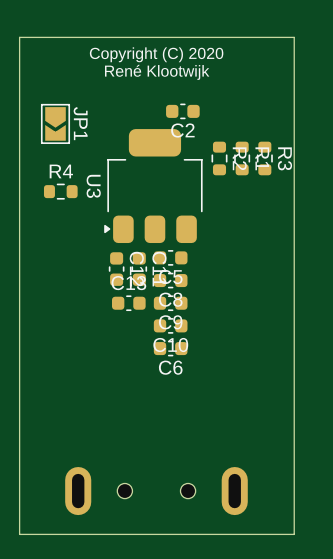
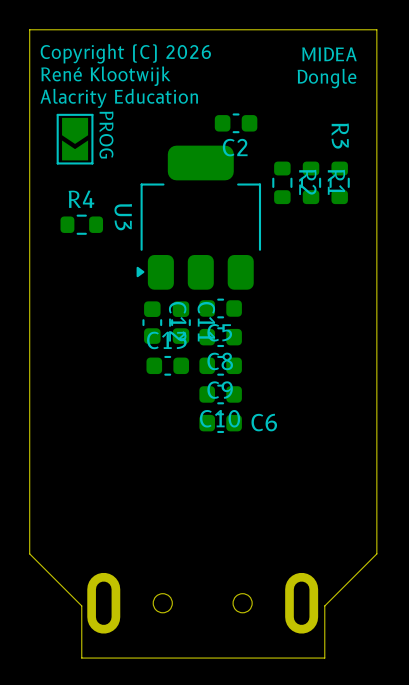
text: Copyright (C) 2020 (156, 54) -> Copyright (C) 2026 (125, 53)
text: none -> MIDEA (329, 54)
text position: René Klootwijk (157, 72) -> René Klootwijk (105, 76)
text: none -> Dongle (326, 78)
text: none -> Alacrity Education (119, 98)
JP1 name: JP1 (80, 123) -> none
text: none -> PROG (106, 135)
R3 name position: R3 (284, 158) -> R3 (340, 136)
C6 name position: C6 (170, 367) -> C6 (264, 422)
board edge: (19, 452) (19, 534) (60, 534) -> (29, 553) (81, 605) (81, 658)
board edge: (294, 452) (294, 534) (253, 534) -> (376, 553) (324, 605) (324, 658)

